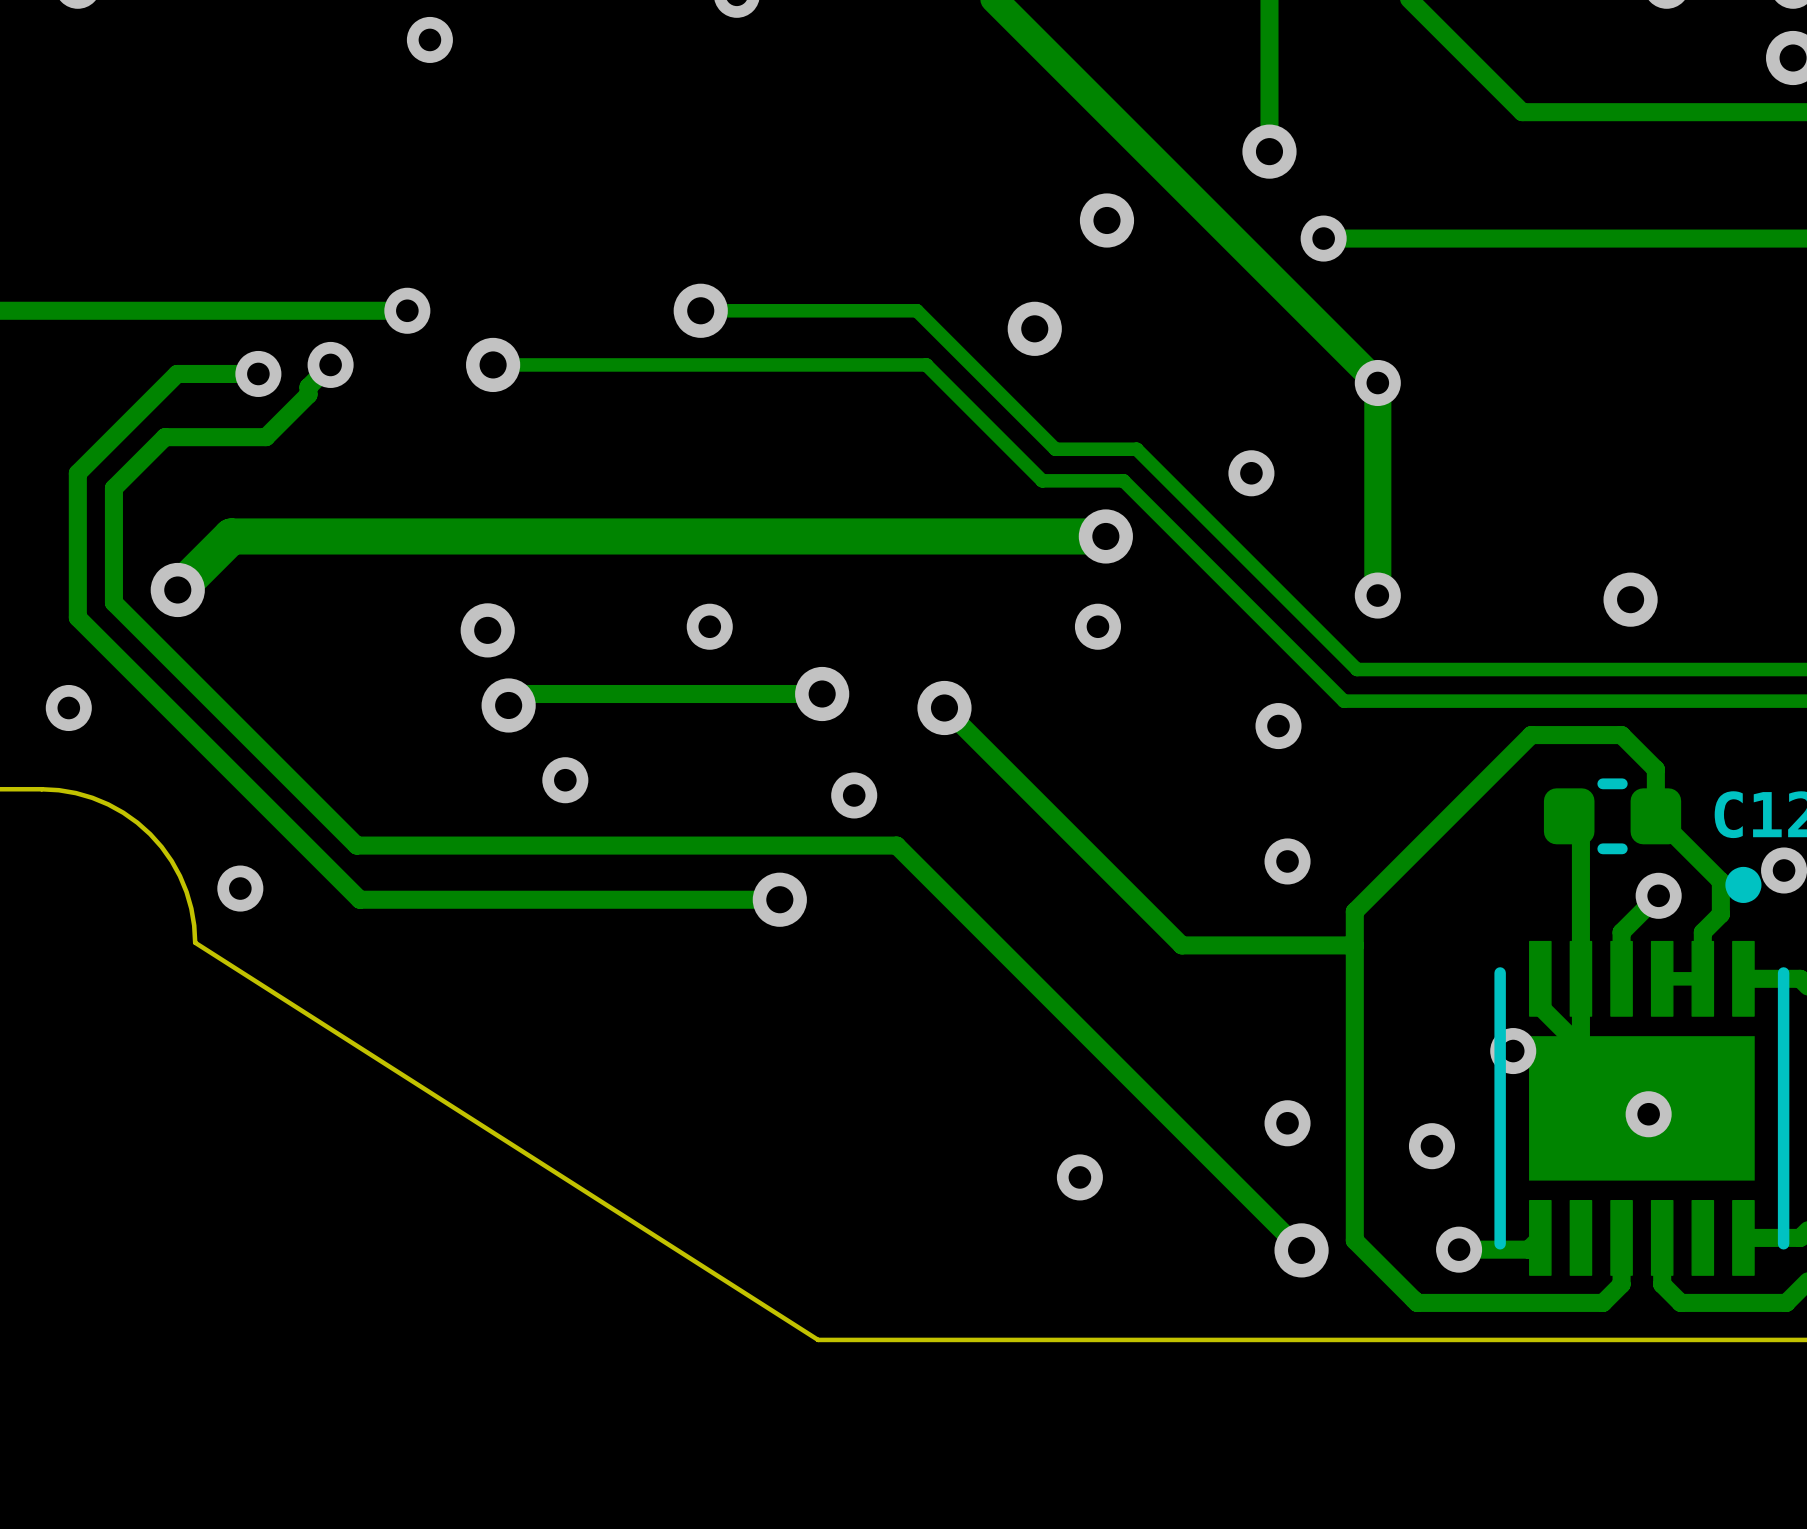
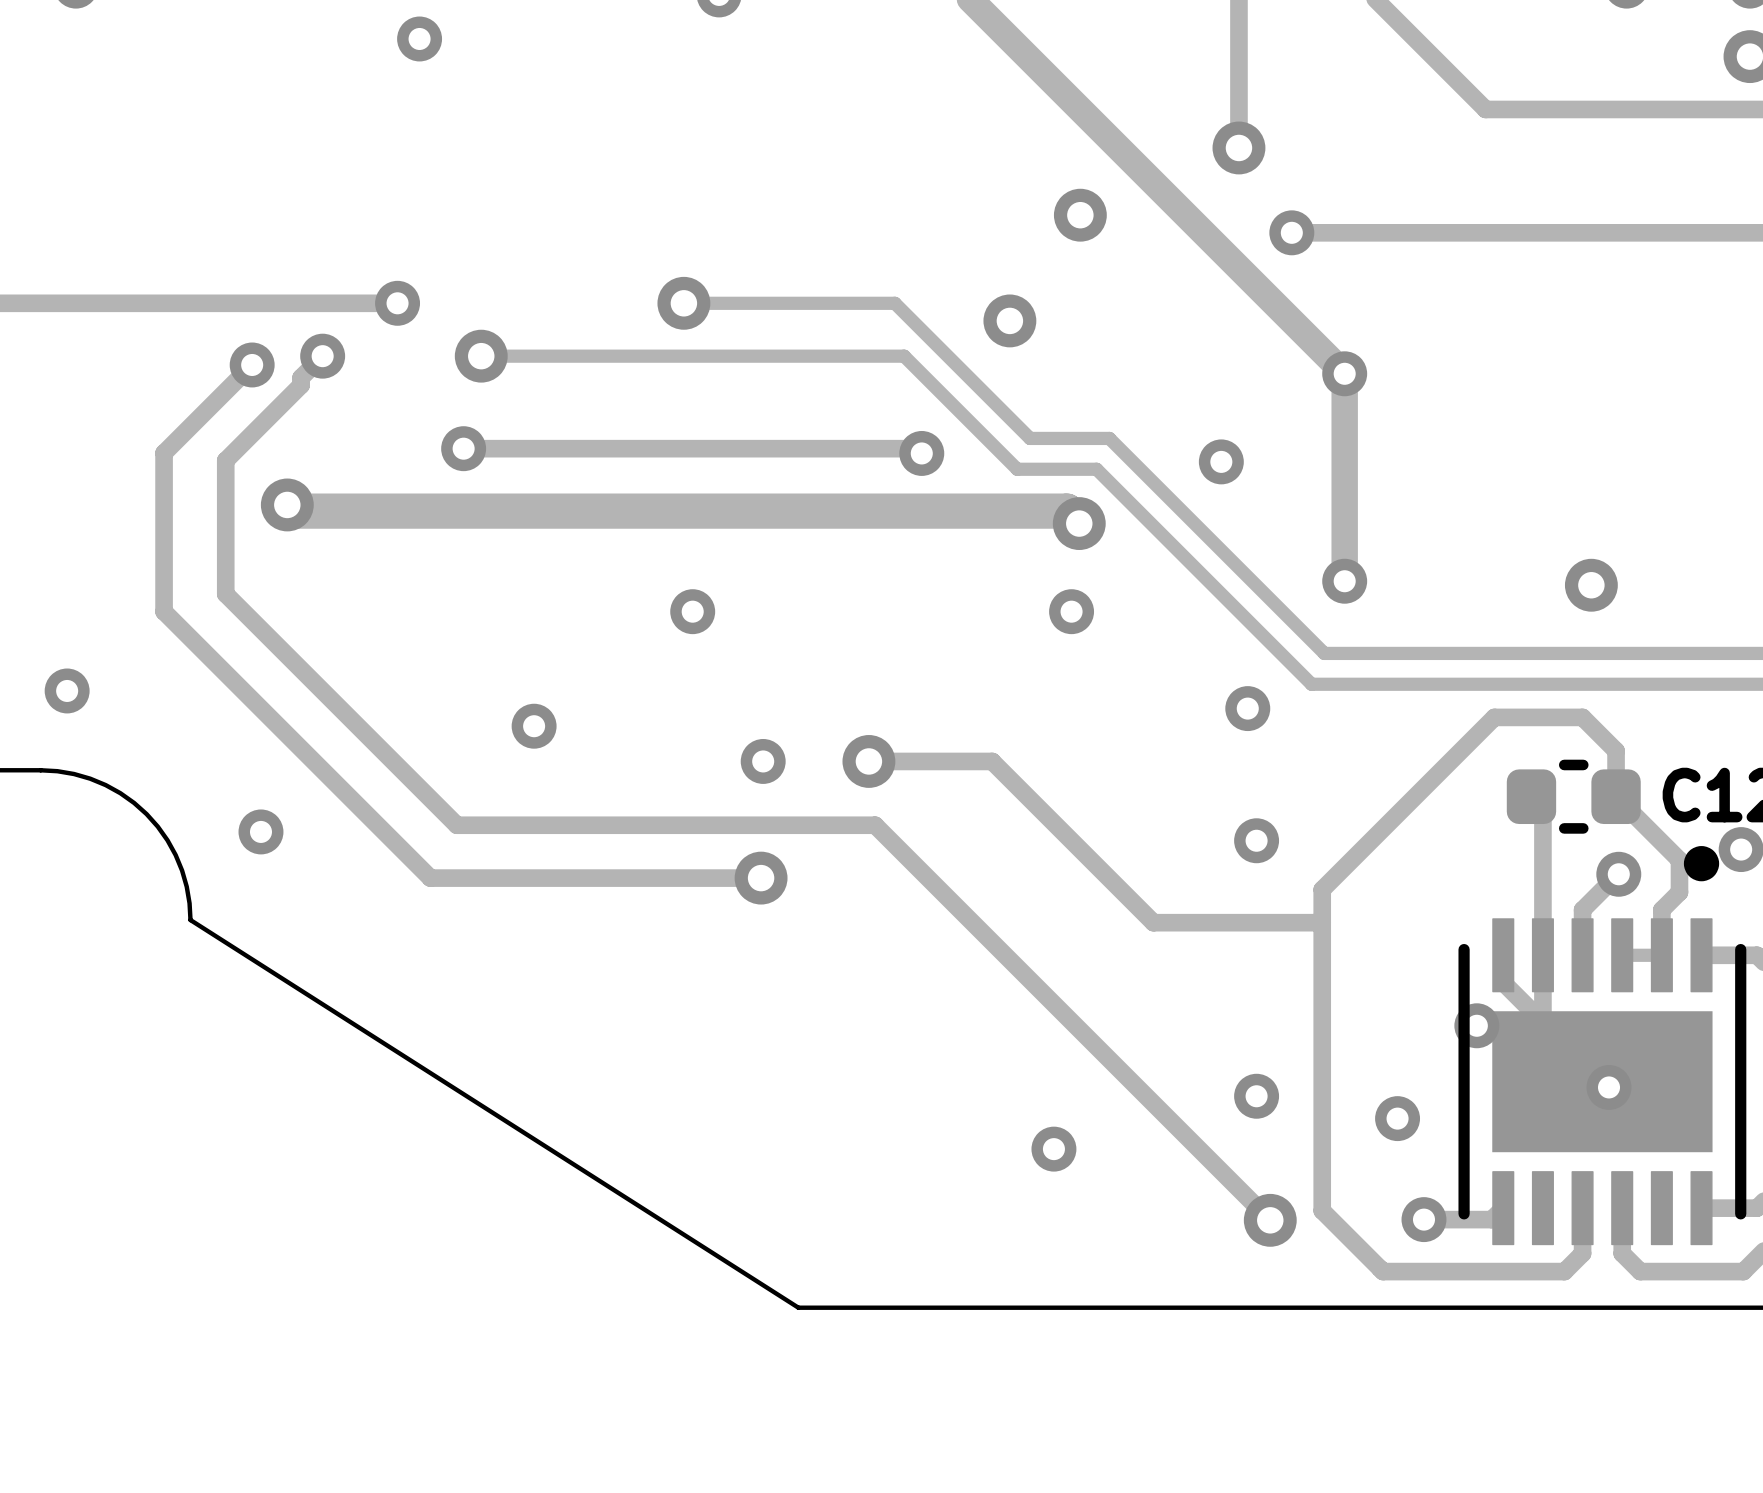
track: (258, 373) (177, 373) (77, 473) (77, 617) (359, 899) (441, 899) -> (252, 364) (164, 453) (164, 611) (430, 878)
track: (266, 437) (165, 437) (113, 488) (113, 602) (356, 845) (468, 845) -> (259, 426) (225, 460) (225, 594) (456, 825)
track: none -> (463, 448) (917, 448) (921, 453)
via: none -> (463, 448)
via: none -> (921, 453)
via: none -> (287, 504)
track: (1105, 536) (231, 536) (177, 589) -> (1079, 523) (1066, 511) (293, 511) (287, 504)
via: (177, 589) -> none
via: (487, 630) -> none
track: (822, 694) (520, 694) (508, 705) -> none
via: (822, 694) -> none
via: (508, 705) -> none
track: (944, 707) (1016, 780) -> (868, 761) (992, 761)
via: (944, 707) -> none
via position: (565, 780) -> (534, 726)
via: none -> (868, 761)
via position: (854, 795) -> (763, 761)
via position: (240, 888) -> (260, 831)

